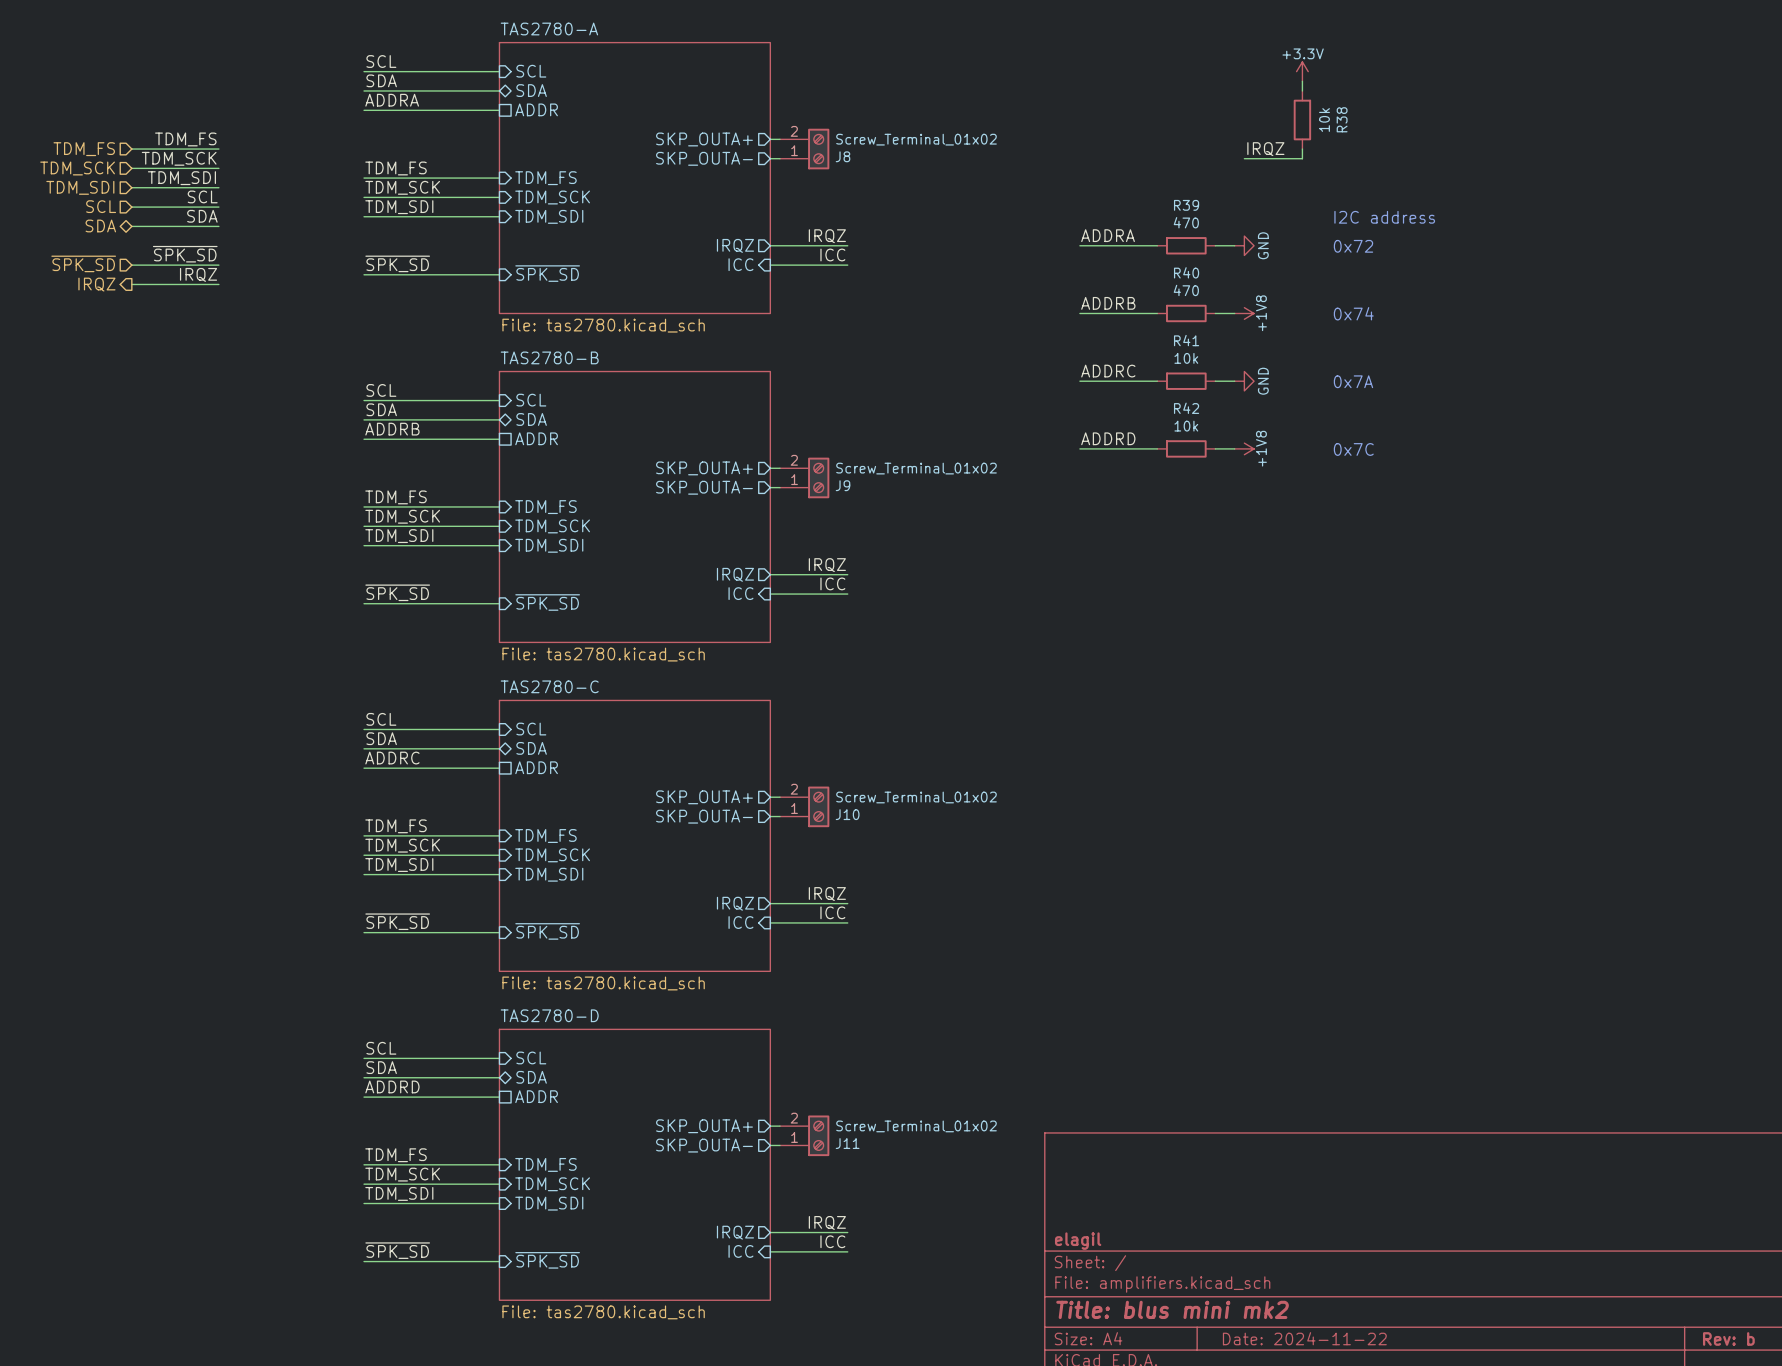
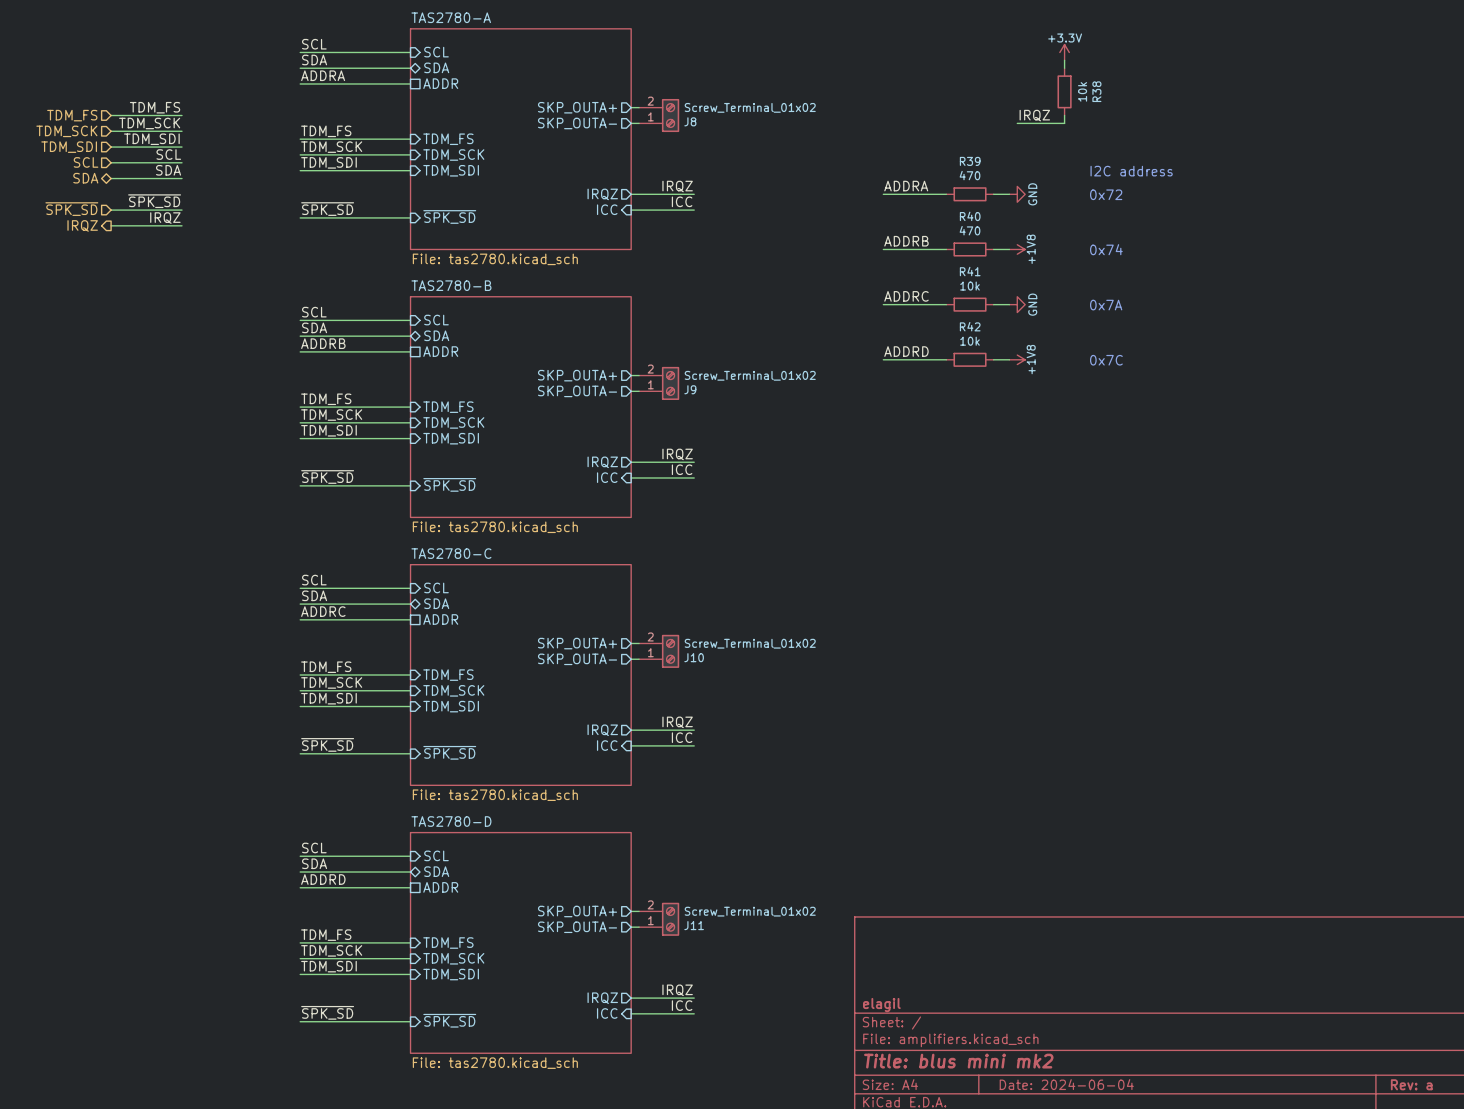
title block: Date: 2024-11-22 (1304, 1338) -> Date: 2024-06-04 (1066, 1084)
title block: Rev: b (1728, 1338) -> Rev: a (1411, 1084)

